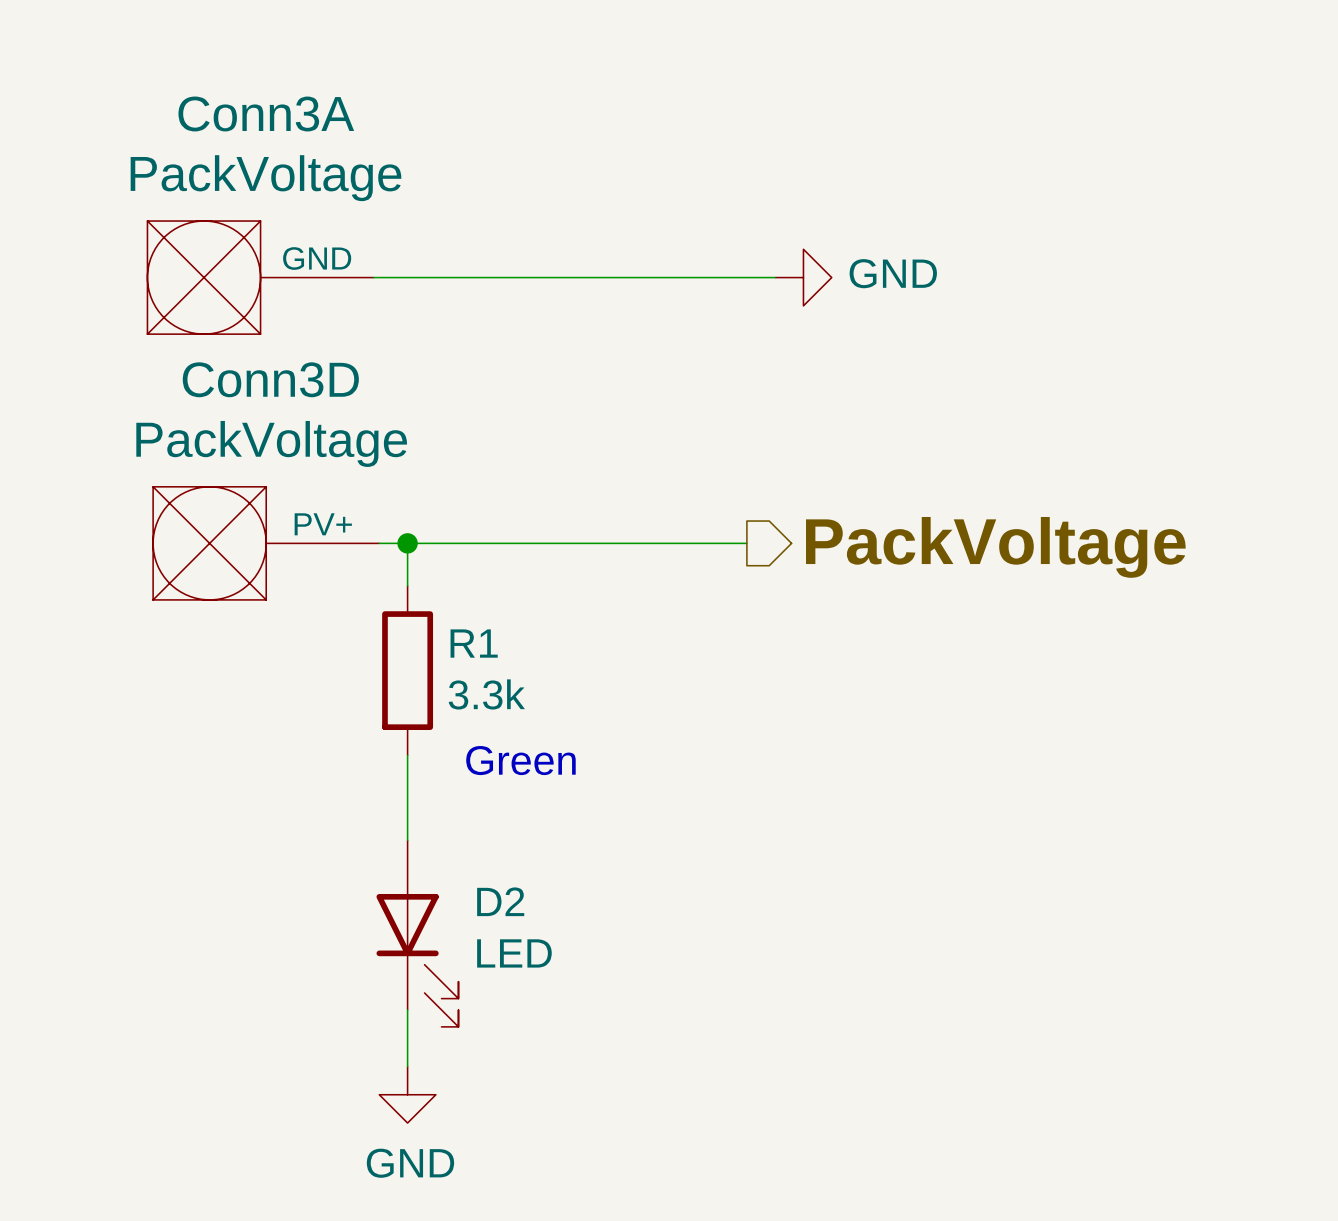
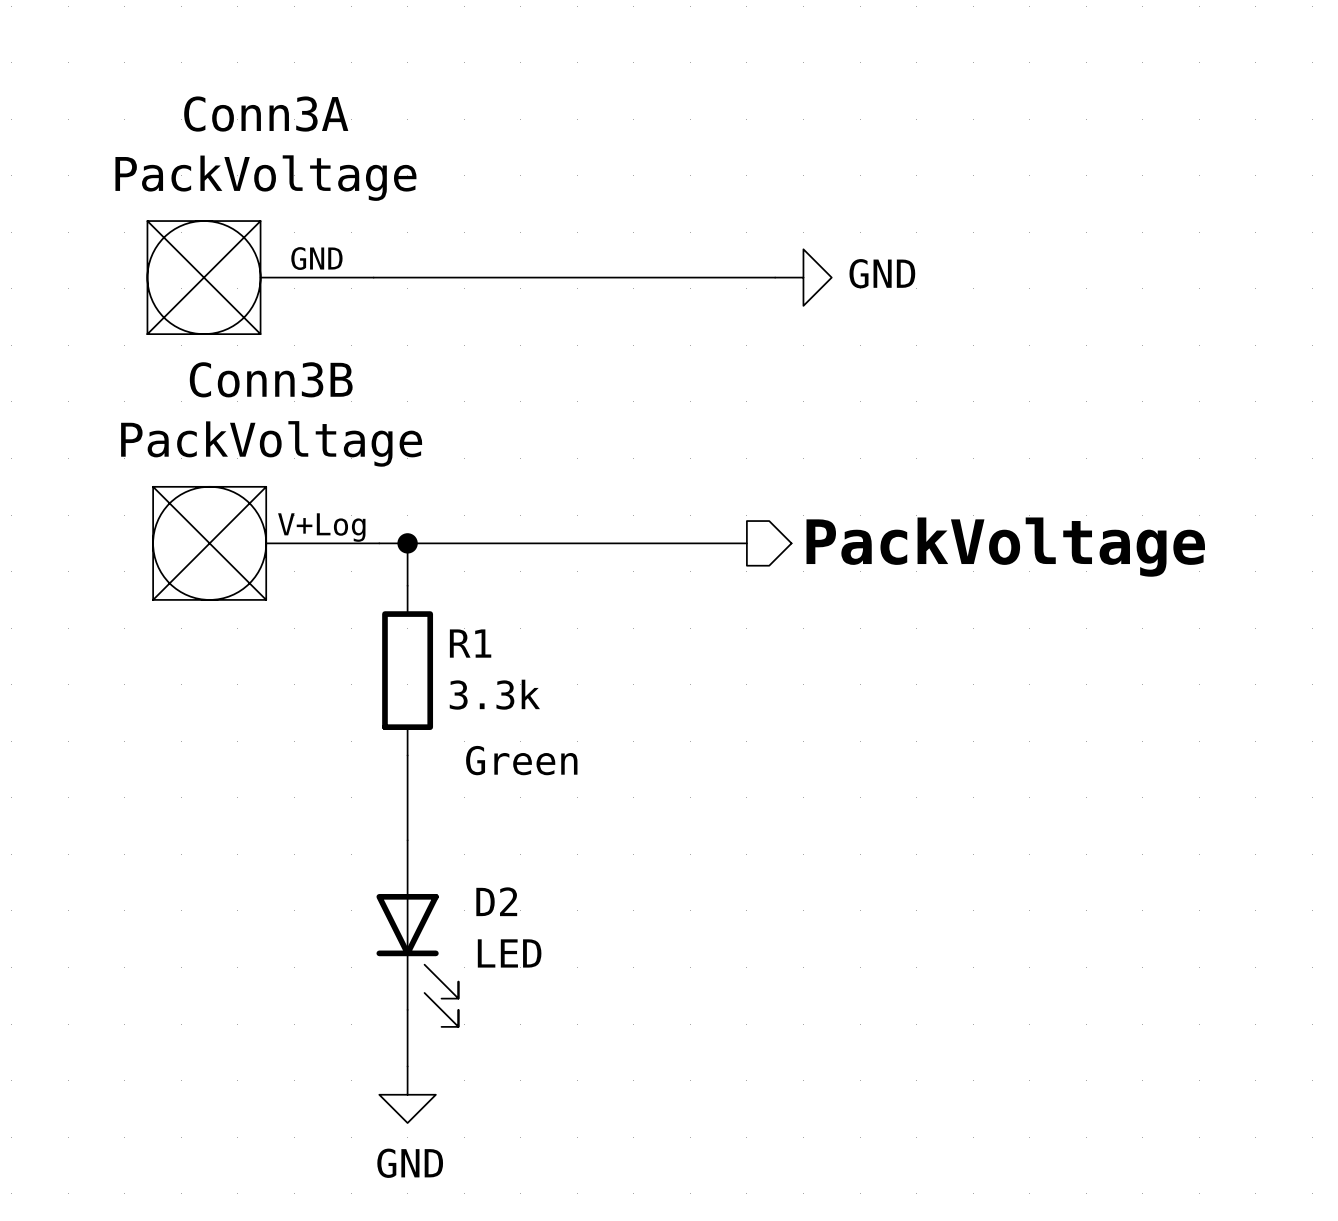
Conn3D name: Conn3D (270, 379) -> Conn3B (271, 379)
Conn3D pin name: PV+ (323, 524) -> V+Log (321, 527)

